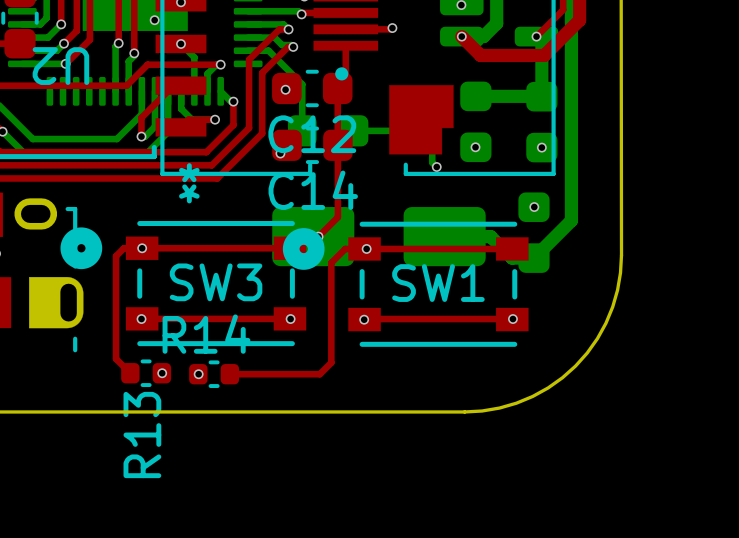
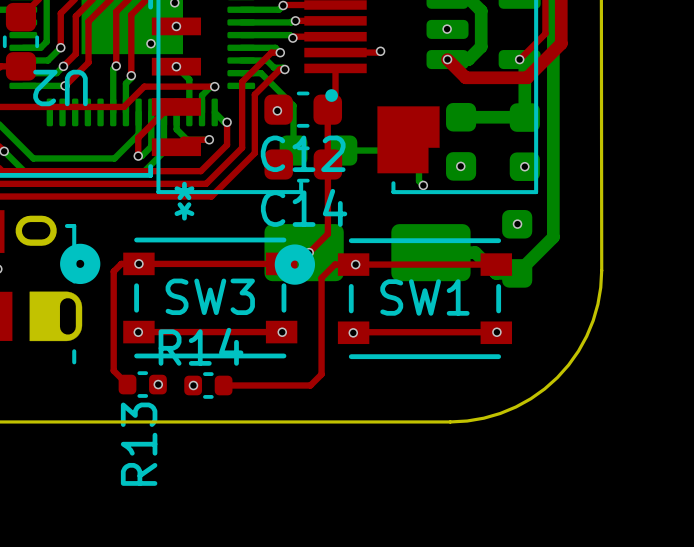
via: (280, 153) -> none

